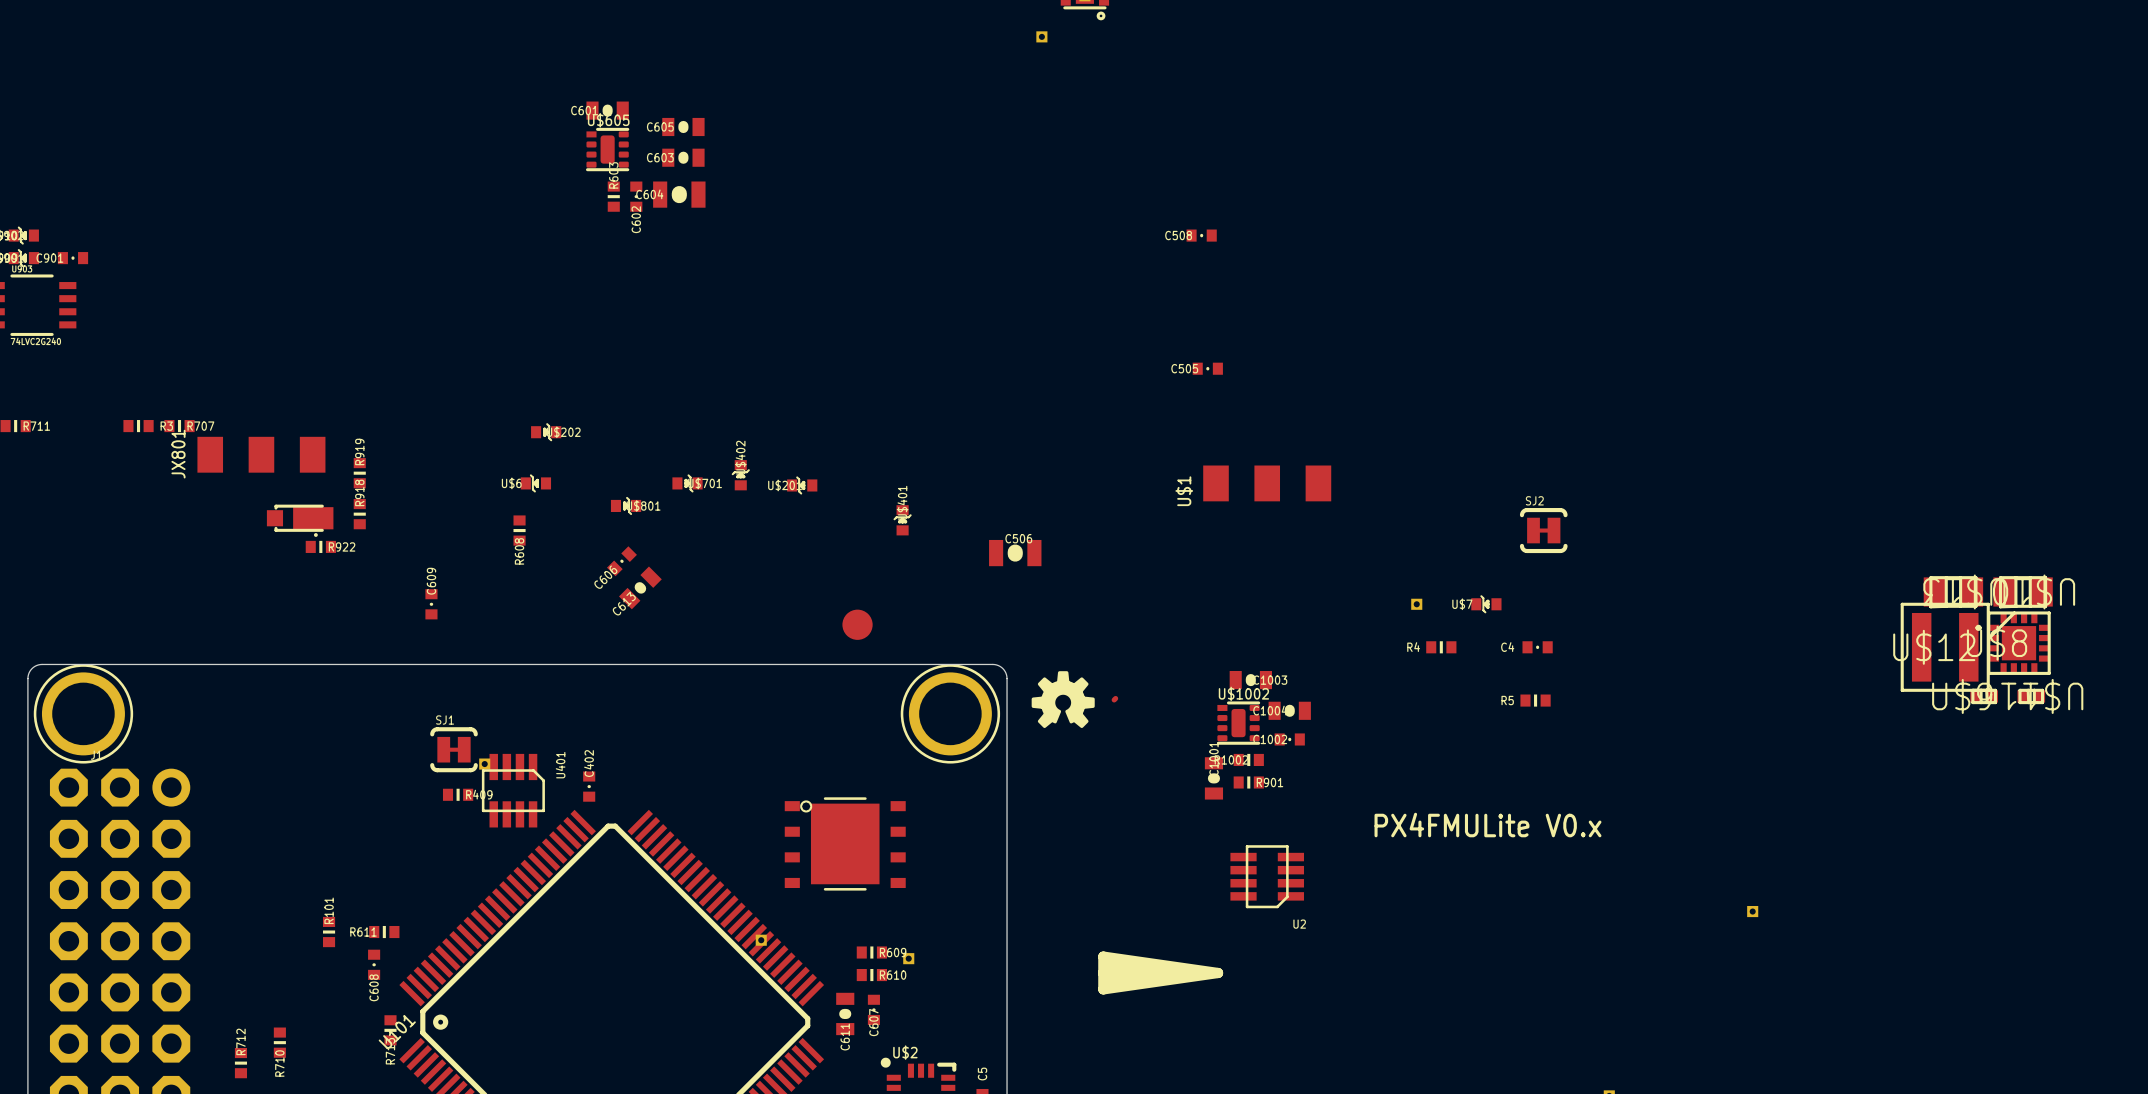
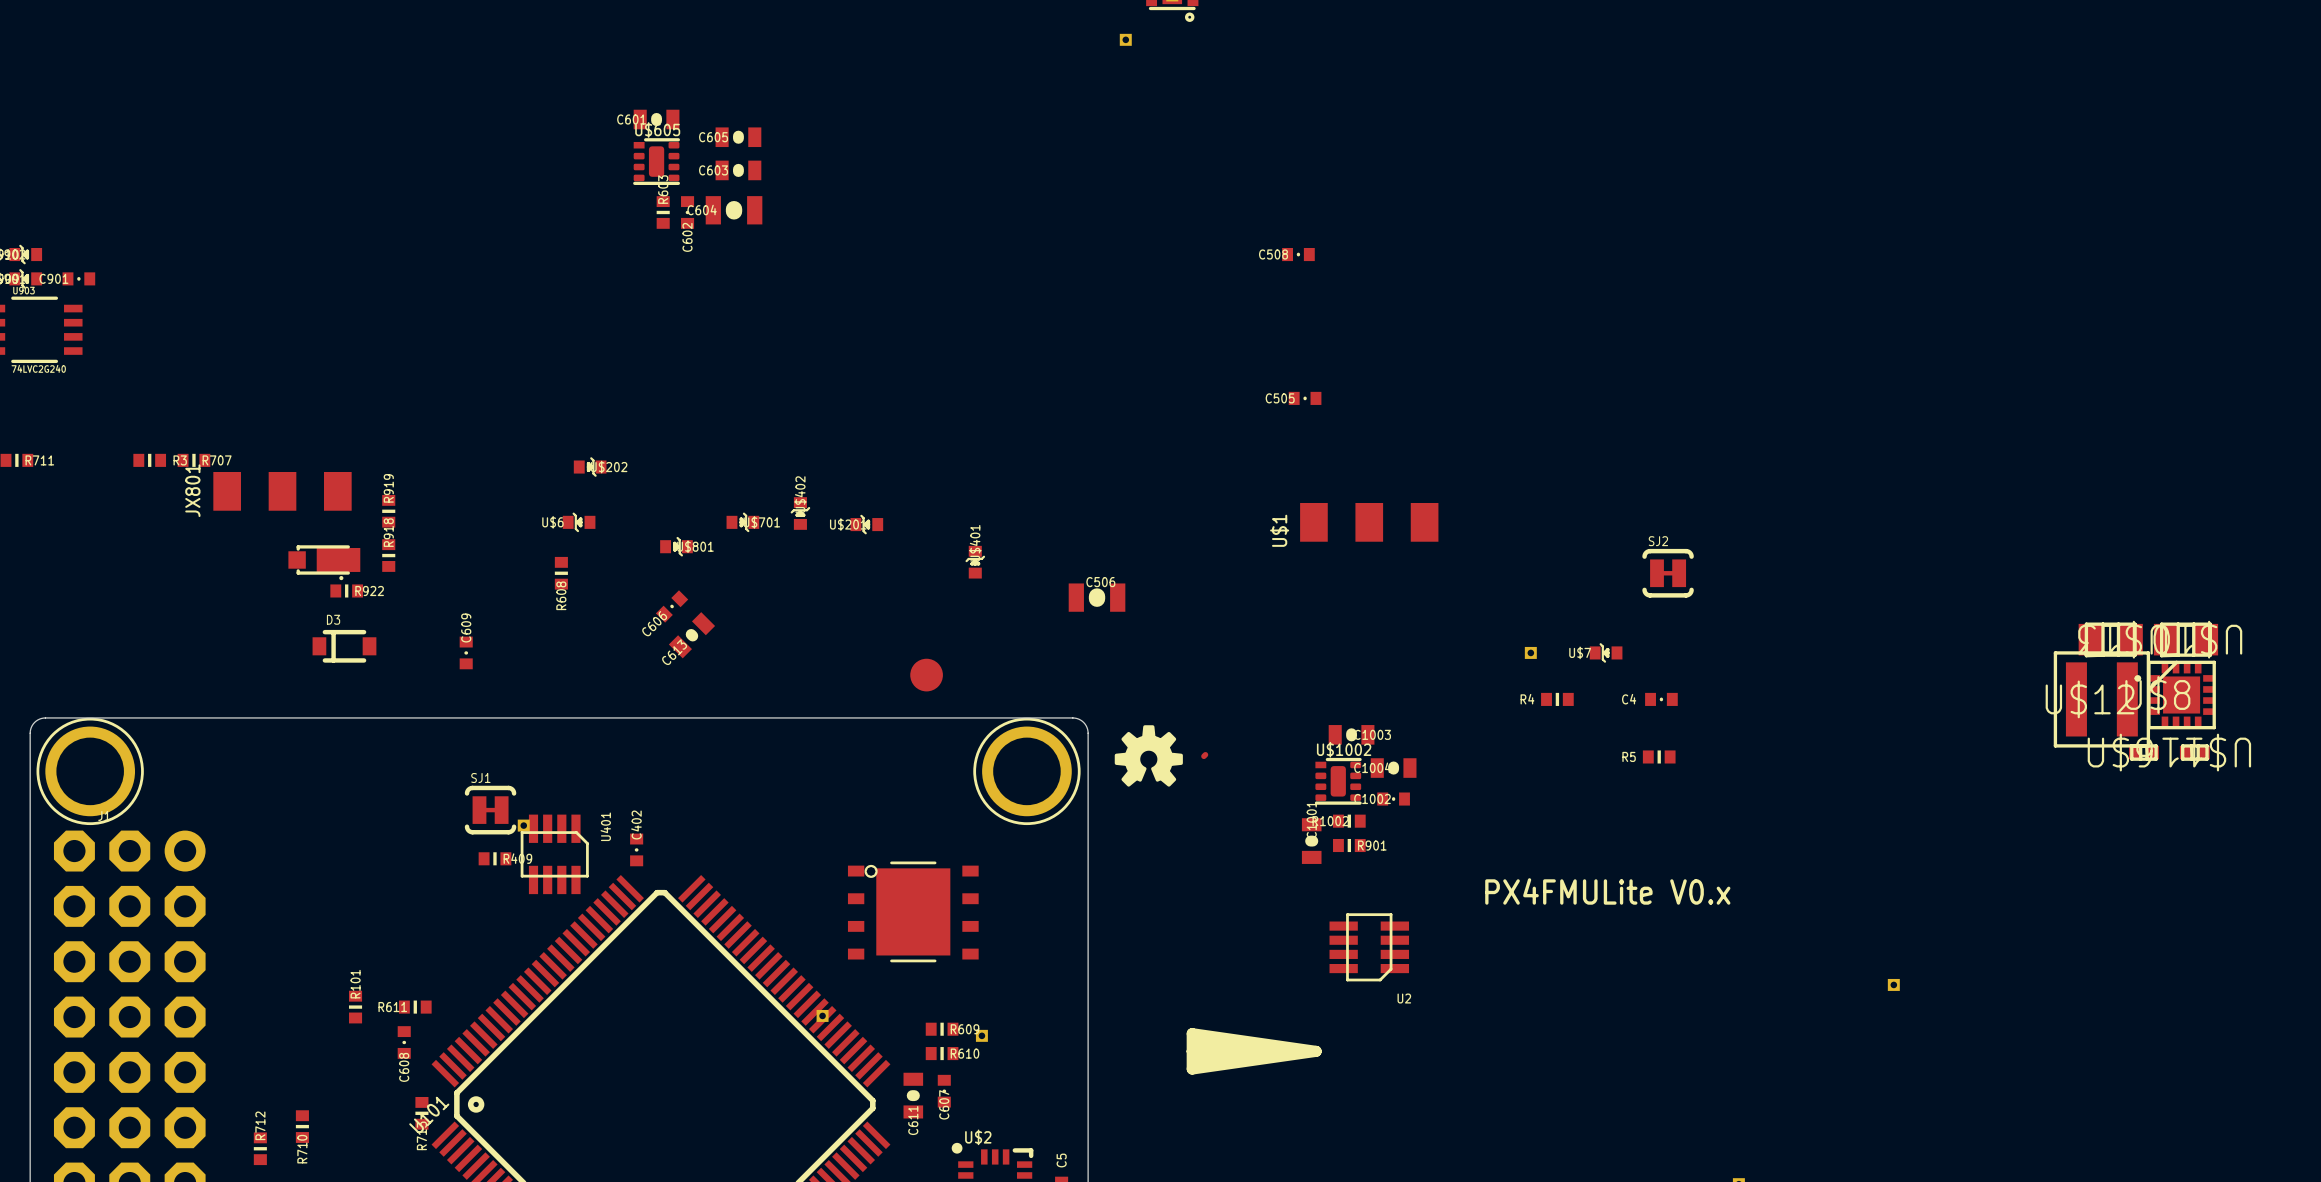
D3: none -> (344, 646)

